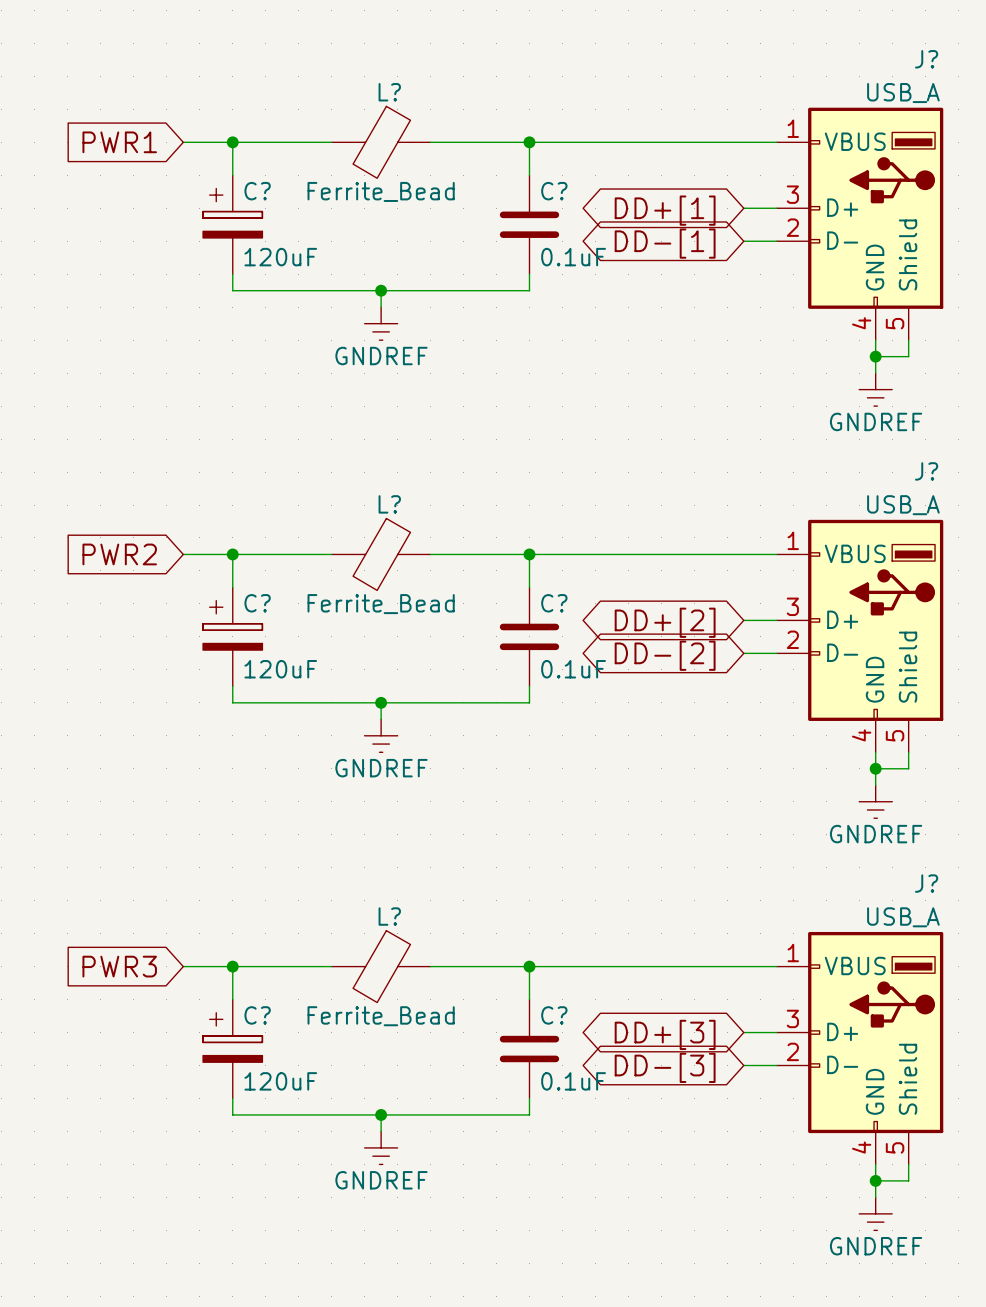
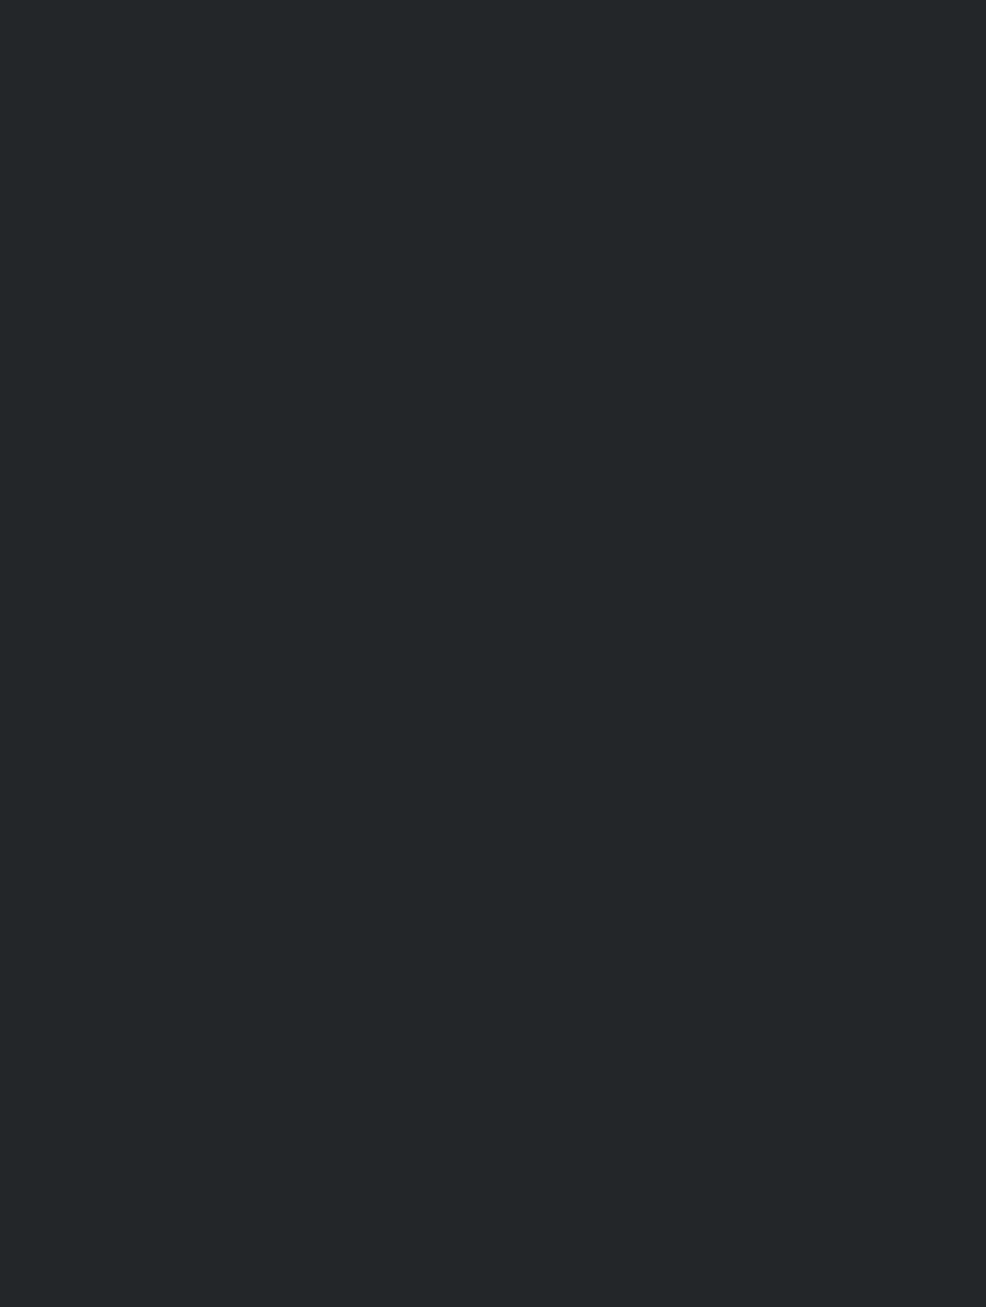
global label: PWR1 (119, 142) -> none
wire: (183, 142) (331, 142) -> none
wire: (232, 142) (232, 175) -> none
junction: (232, 142) -> none
L?: Ferrite_Bead (381, 142) -> none
wire: (430, 142) (776, 142) -> none
wire: (529, 142) (529, 175) -> none
junction: (529, 142) -> none
wire: (743, 208) (776, 208) -> none
global label: DD+[1] (665, 210) -> none
J?: USB_A (860, 223) -> none
C?: 120uF (232, 224) -> none
C?: 0.1uF (529, 224) -> none
wire: (743, 241) (776, 241) -> none
global label: DD-[1] (665, 243) -> none
wire: (232, 274) (232, 290) (529, 290) (529, 274) -> none
wire: (381, 290) (381, 307) -> none
junction: (381, 290) -> none
power symbol: GNDREF (381, 323) -> none
wire: (875, 340) (875, 373) -> none
wire: (908, 340) (908, 356) (875, 356) -> none
junction: (875, 356) -> none
power symbol: GNDREF (875, 389) -> none
global label: PWR2 (119, 554) -> none
wire: (183, 554) (331, 554) -> none
wire: (232, 554) (232, 587) -> none
junction: (232, 554) -> none
L?: Ferrite_Bead (381, 554) -> none
wire: (430, 554) (776, 554) -> none
wire: (529, 554) (529, 587) -> none
junction: (529, 554) -> none
wire: (743, 620) (776, 620) -> none
global label: DD+[2] (665, 622) -> none
C?: 120uF (232, 636) -> none
C?: 0.1uF (529, 636) -> none
J?: USB_A (860, 636) -> none
wire: (743, 653) (776, 653) -> none
global label: DD-[2] (665, 655) -> none
wire: (232, 686) (232, 702) (529, 702) (529, 686) -> none
wire: (381, 702) (381, 719) -> none
junction: (381, 702) -> none
power symbol: GNDREF (381, 735) -> none
wire: (875, 752) (875, 785) -> none
wire: (908, 752) (908, 768) (875, 768) -> none
junction: (875, 768) -> none
power symbol: GNDREF (875, 801) -> none
global label: PWR3 (119, 966) -> none
wire: (183, 966) (331, 966) -> none
wire: (232, 966) (232, 999) -> none
junction: (232, 966) -> none
L?: Ferrite_Bead (381, 966) -> none
wire: (430, 966) (776, 966) -> none
wire: (529, 966) (529, 999) -> none
junction: (529, 966) -> none
wire: (743, 1032) (776, 1032) -> none
global label: DD+[3] (665, 1034) -> none
J?: USB_A (860, 1048) -> none
C?: 120uF (232, 1049) -> none
C?: 0.1uF (529, 1049) -> none
wire: (743, 1065) (776, 1065) -> none
global label: DD-[3] (665, 1067) -> none
wire: (232, 1098) (232, 1114) (529, 1114) (529, 1098) -> none
wire: (381, 1114) (381, 1131) -> none
junction: (381, 1114) -> none
power symbol: GNDREF (381, 1147) -> none
wire: (875, 1164) (875, 1197) -> none
wire: (908, 1164) (908, 1180) (875, 1180) -> none
junction: (875, 1180) -> none
power symbol: GNDREF (875, 1213) -> none

